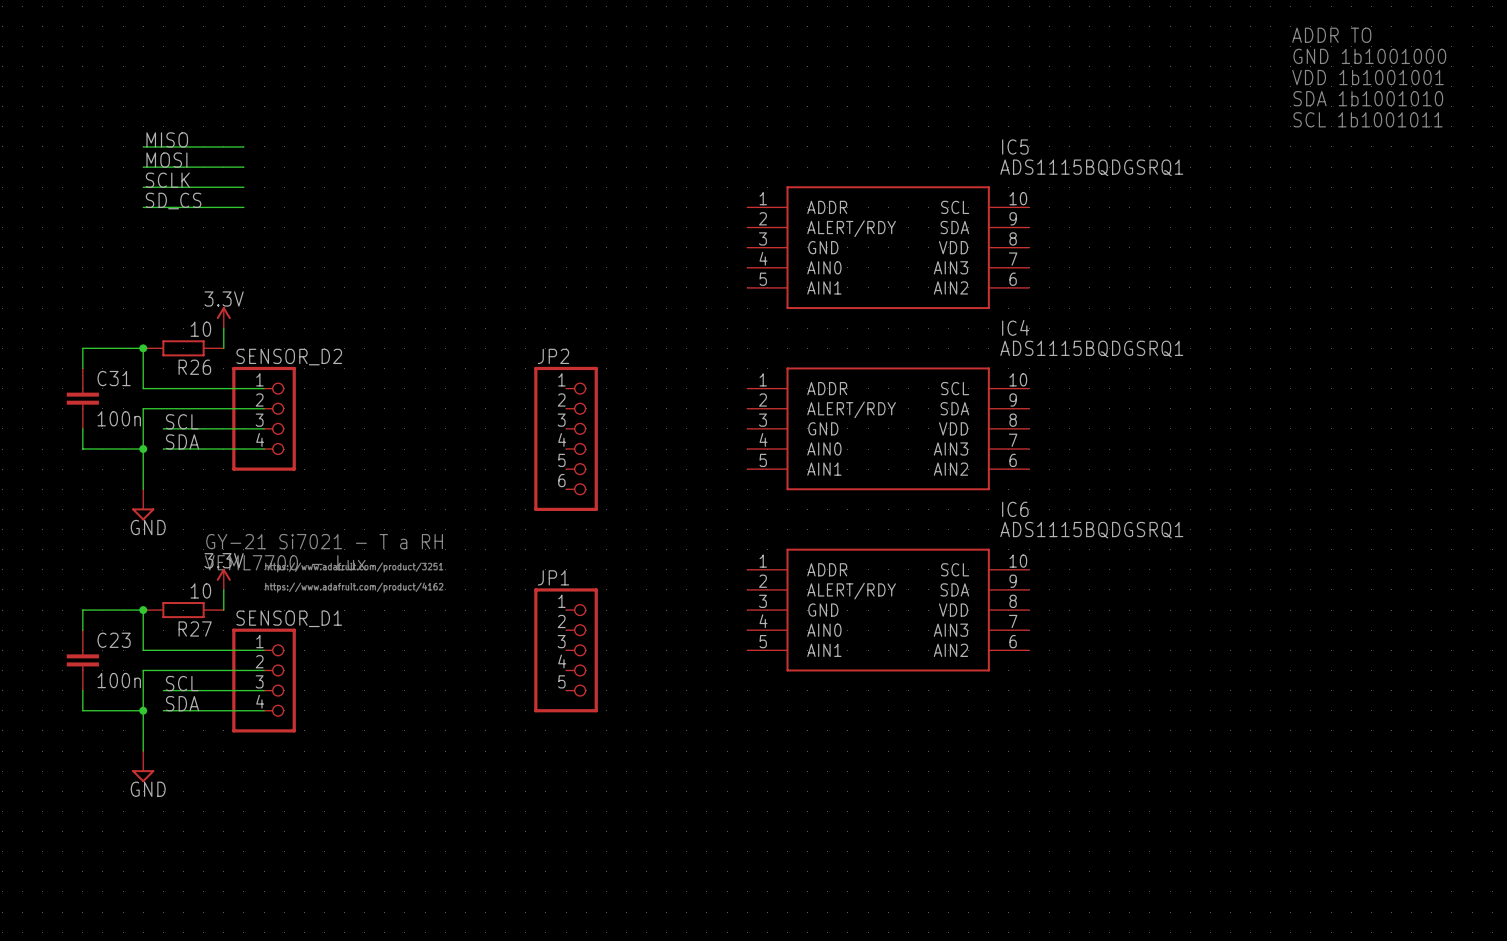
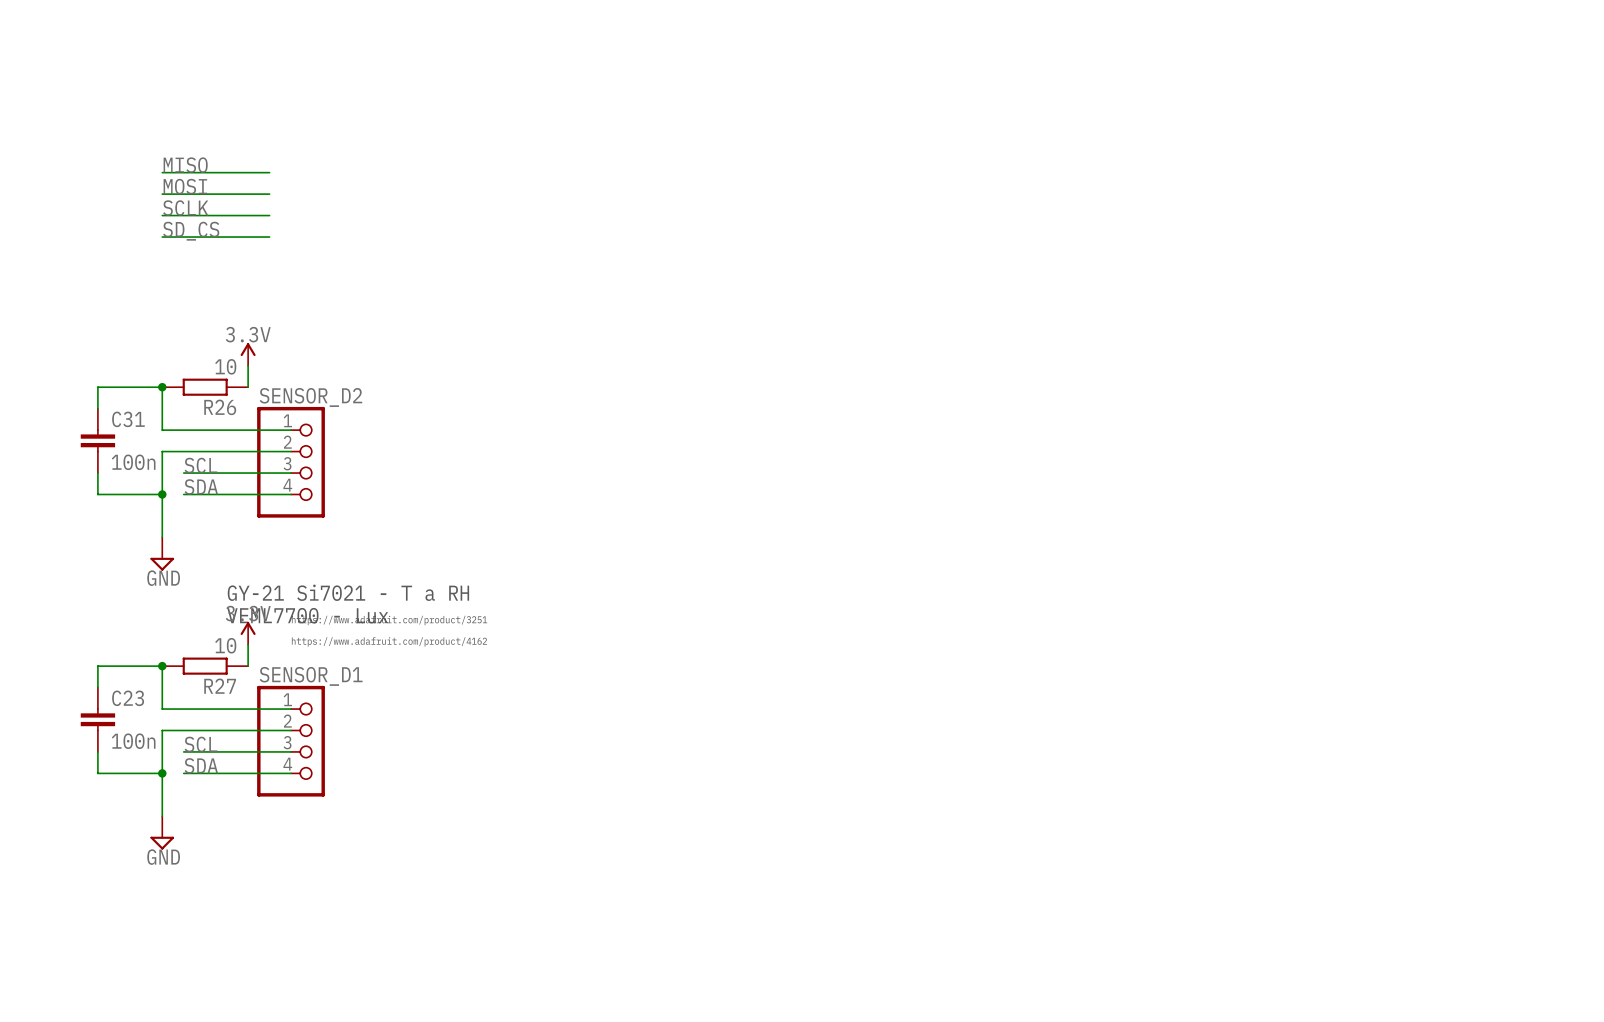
text: ADDR TO (1331, 35) -> none
text: GND 1b1001000 (1369, 56) -> none
text: VDD 1b1001001 (1368, 77) -> none
text: SDA 1b1001010 (1368, 98) -> none
text: SCL 1b1001011 (1368, 119) -> none
IC5: ADS1115BQDGSRQ1 (888, 247) -> none
IC4: ADS1115BQDGSRQ1 (888, 428) -> none
JP2: (566, 438) -> none
IC6: ADS1115BQDGSRQ1 (888, 610) -> none
JP1: (566, 650) -> none

